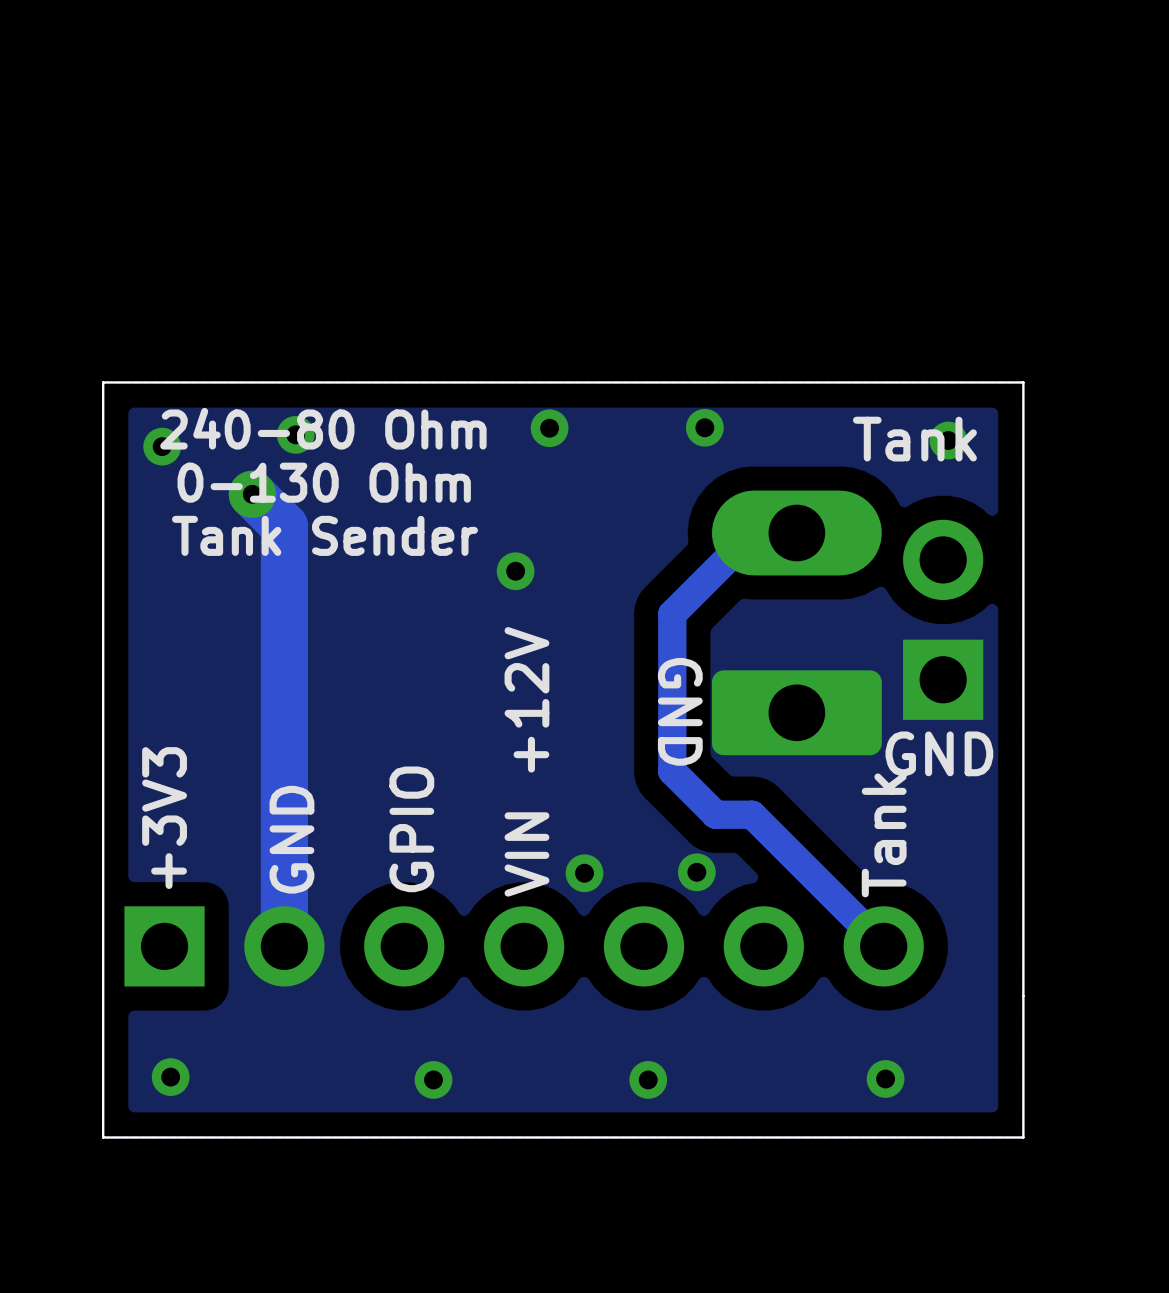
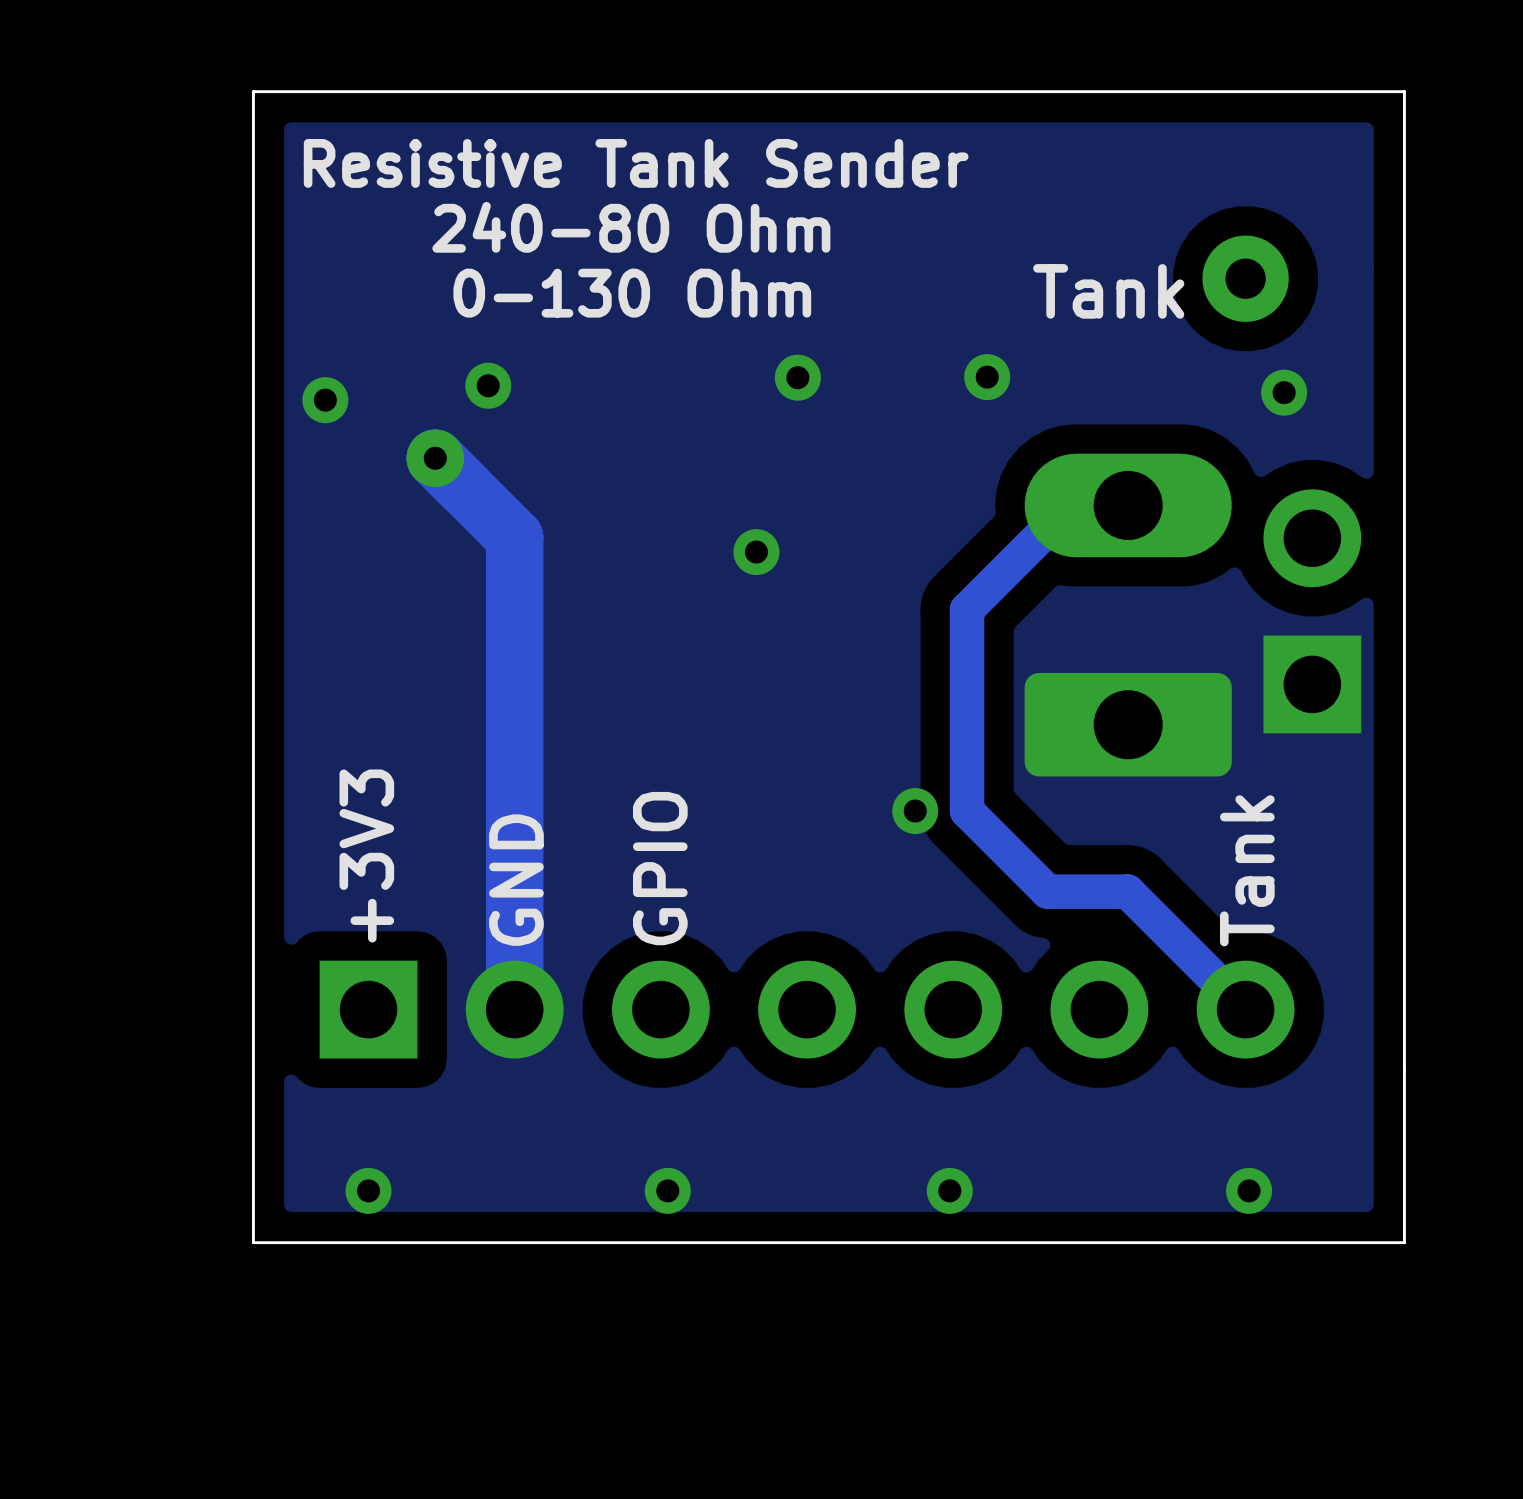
text: none -> Resistive Tank Sender (636, 163)
part: none -> (1245, 278)
board edge: (103, 382) (1023, 382) (1023, 1137) -> (253, 321) (253, 91) (1404, 91) (1404, 1242) (1375, 1242)
text position: 240-80 Ohm (323, 428) -> 240-80 Ohm (631, 227)
text position: Tank (914, 439) -> Tank (1108, 291)
text position: 0-130 Ohm (324, 482) -> 0-130 Ohm (632, 293)
track: (284, 526) (284, 946) -> (474, 497) (514, 537) (514, 1009)
track: (733, 533) (753, 533) (672, 614) (672, 771) (715, 814) (752, 814) (883, 946) -> none
track: none -> (1071, 505) (967, 609) (967, 811) (1047, 891) (1127, 891) (1245, 1009) (1225, 1009)
text: Tank Sender (324, 535) -> none
part position: (943, 619) -> (1312, 611)
part position: (796, 622) -> (1128, 615)
text: GND (680, 711) -> none
text: GND (939, 753) -> none
text: VIN +12V (526, 761) -> none
via: none -> (915, 811)
text position: +3V3 (164, 818) -> +3V3 (366, 855)
text position: GPIO (411, 829) -> GPIO (660, 868)
text position: Tank (884, 835) -> Tank (1247, 870)
text position: GND (291, 839) -> GND (516, 880)
via: (696, 872) -> none
via: (584, 873) -> none
part position: (524, 946) -> (807, 1009)
via position: (170, 1077) -> (368, 1190)
via position: (885, 1078) -> (1249, 1190)
via position: (433, 1079) -> (667, 1190)
via position: (648, 1079) -> (949, 1190)

